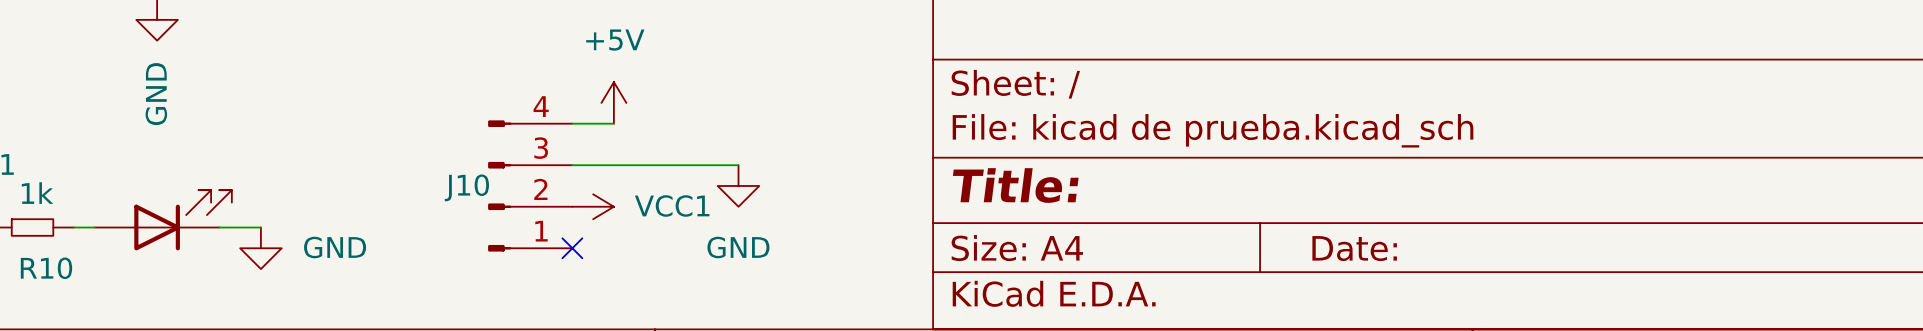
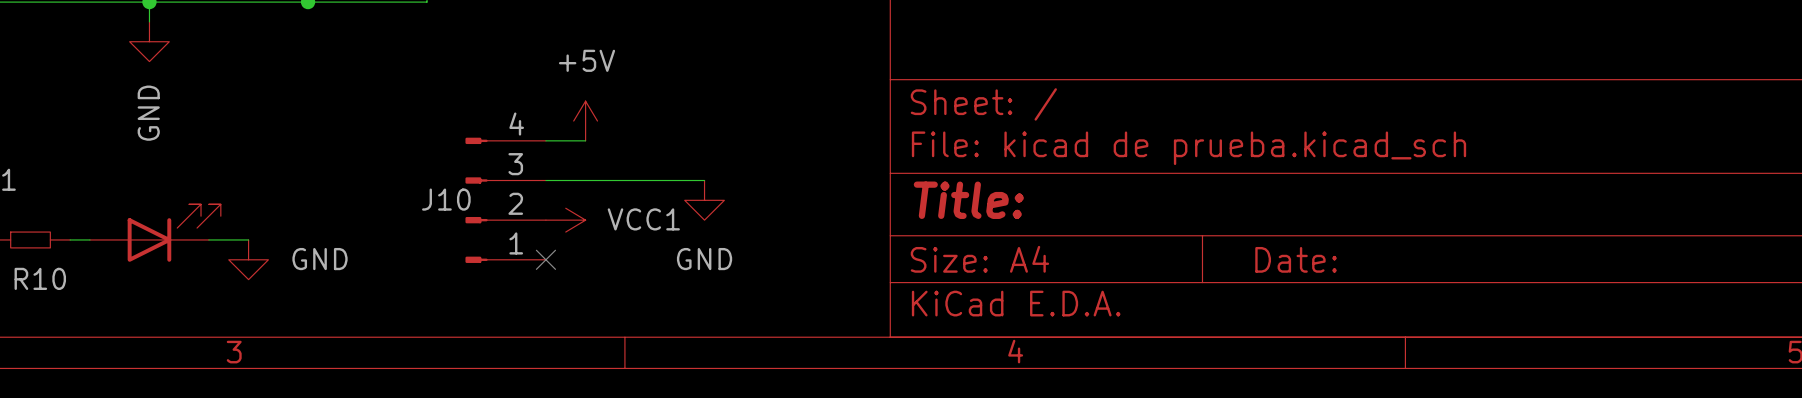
R10 value: 1k (37, 193) -> none

